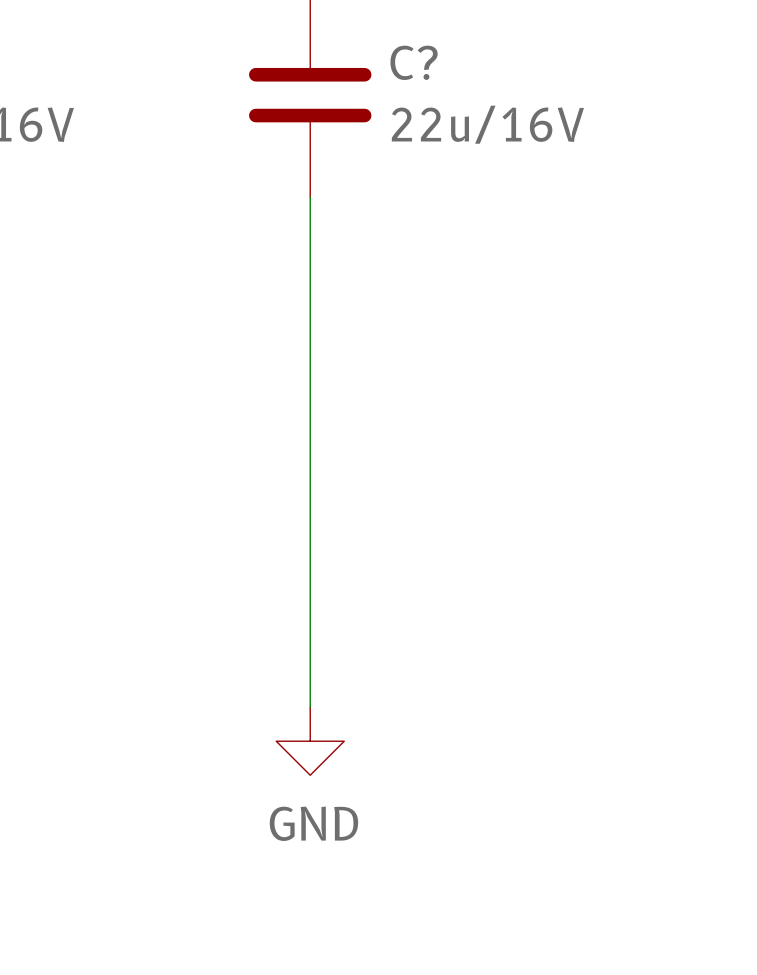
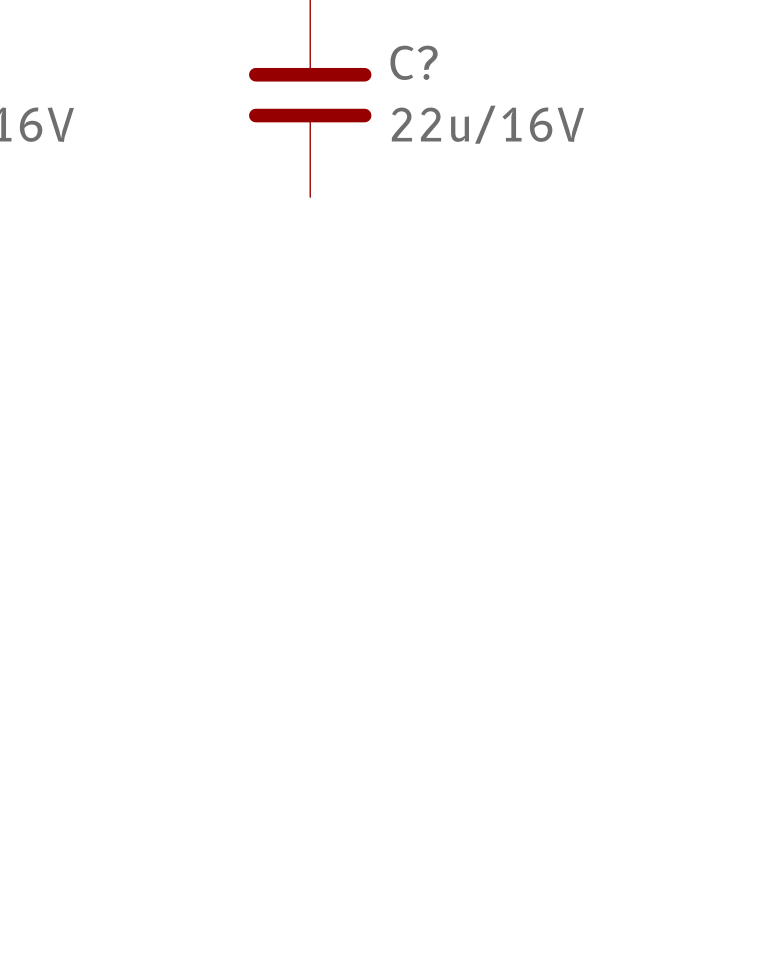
wire: (310, 197) (310, 707) -> none
power symbol: GND (310, 741) -> none

